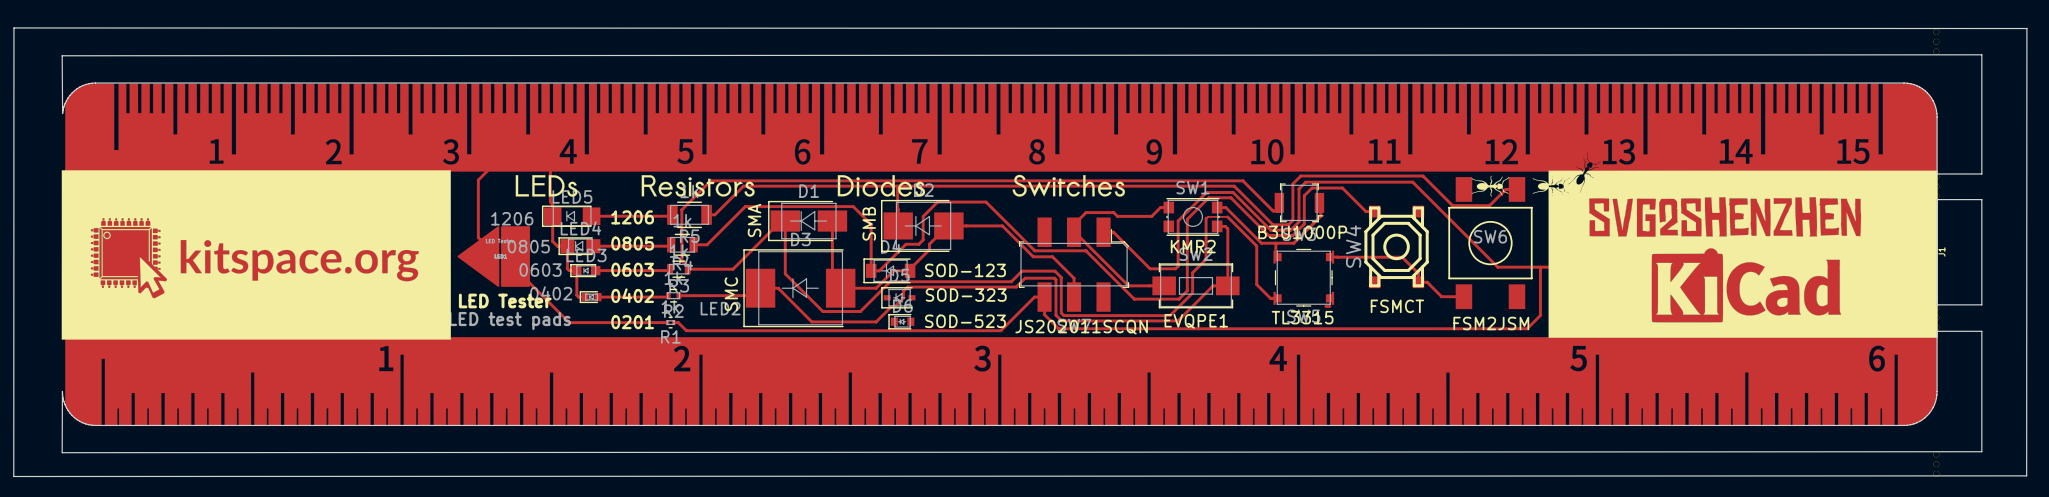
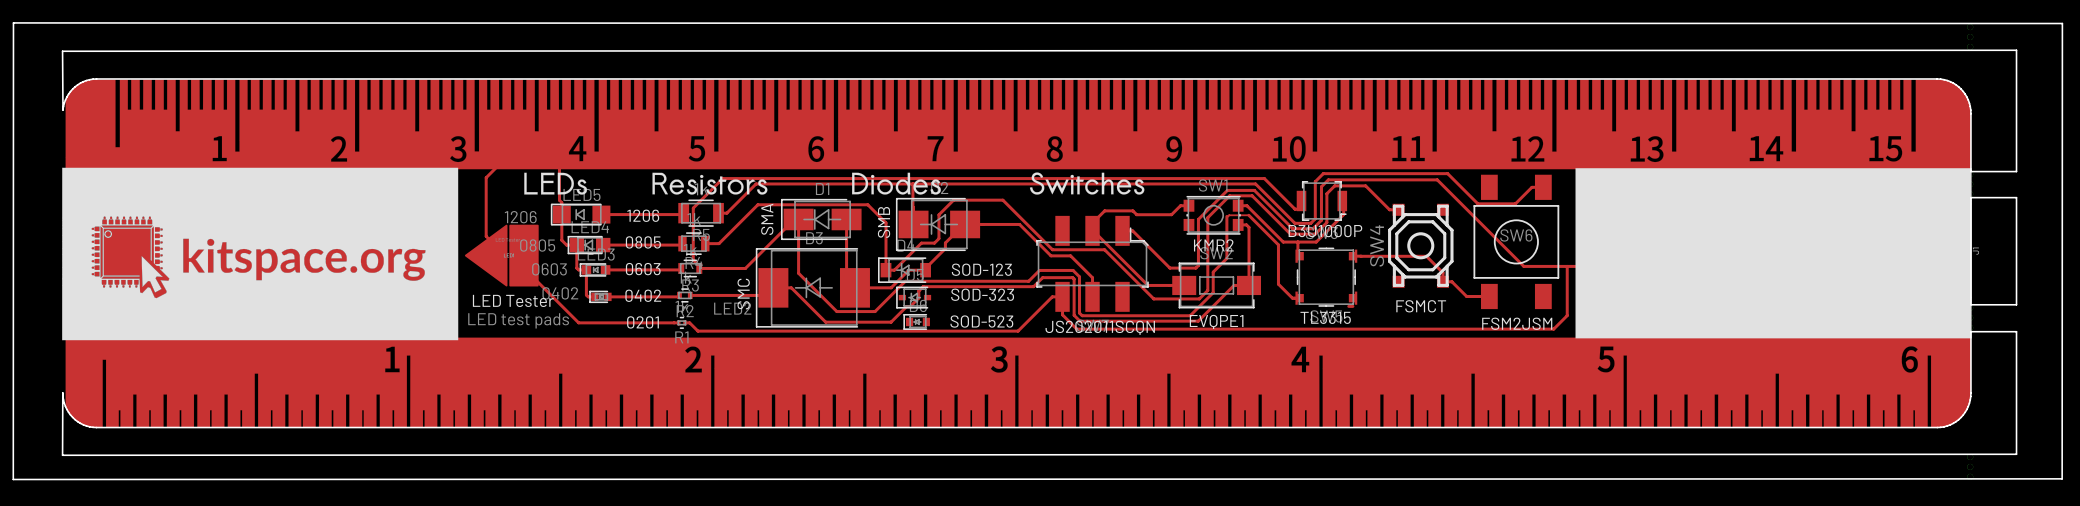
part footprint: [13, 27, 2028, 478] -> [12, 22, 2063, 481]

